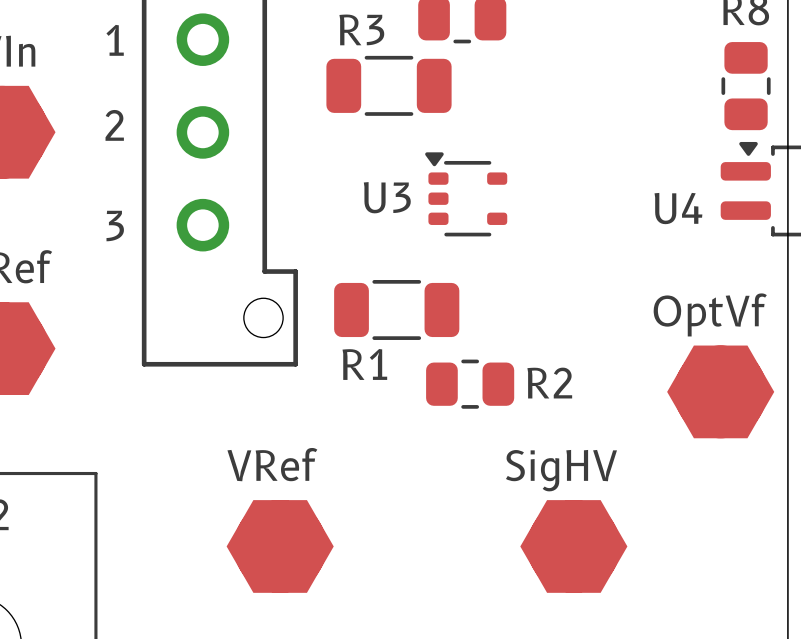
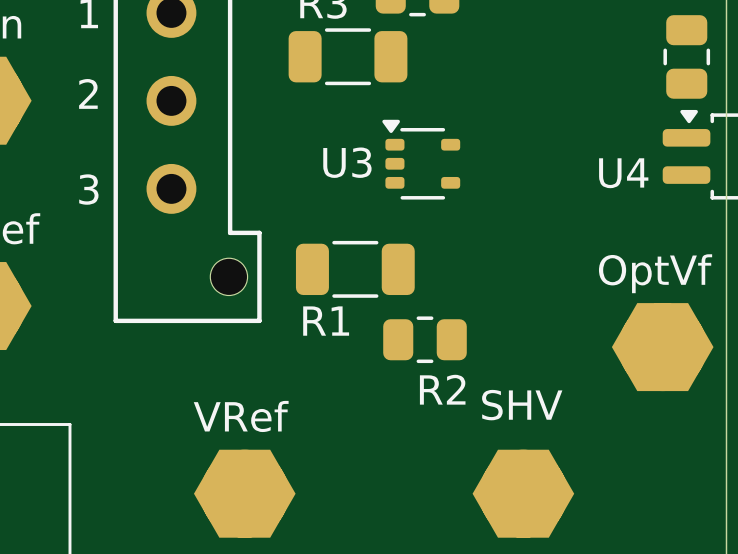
R2 name position: R2 (549, 383) -> R2 (442, 389)
text: SigHV (561, 470) -> SHV (522, 405)

